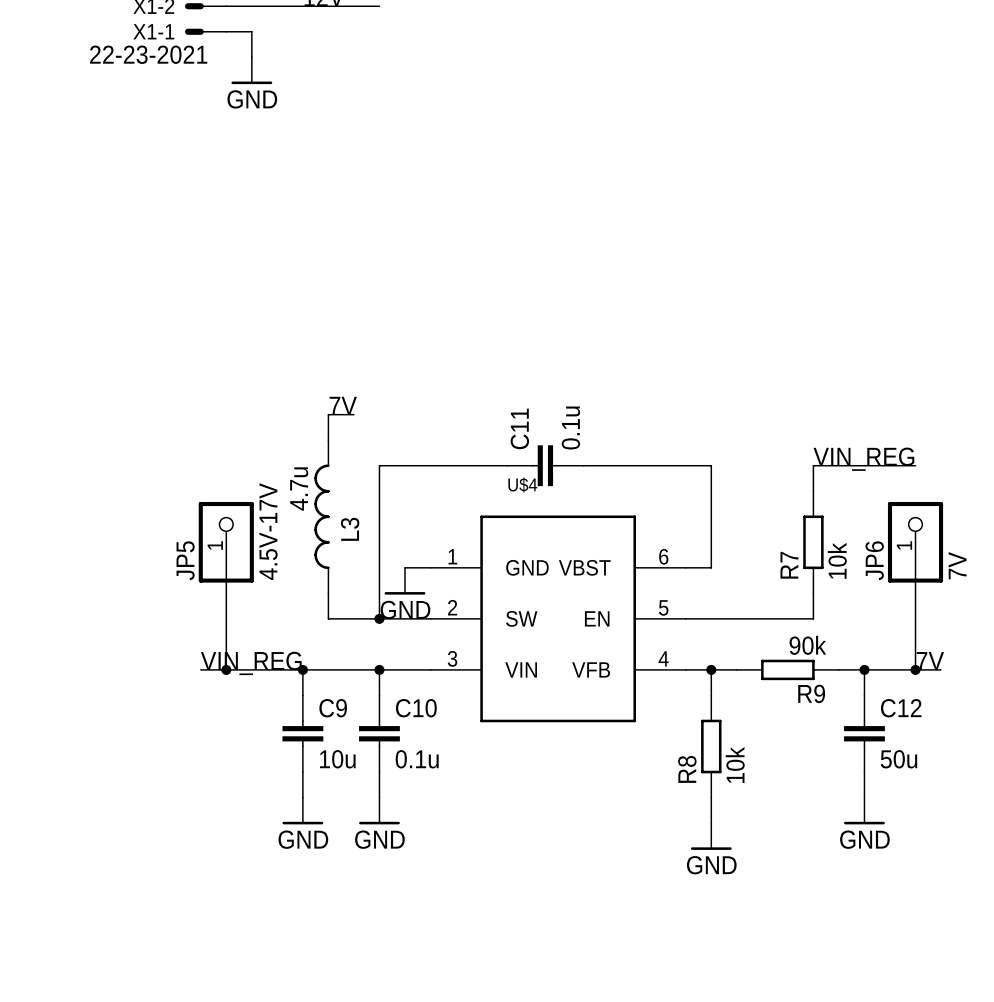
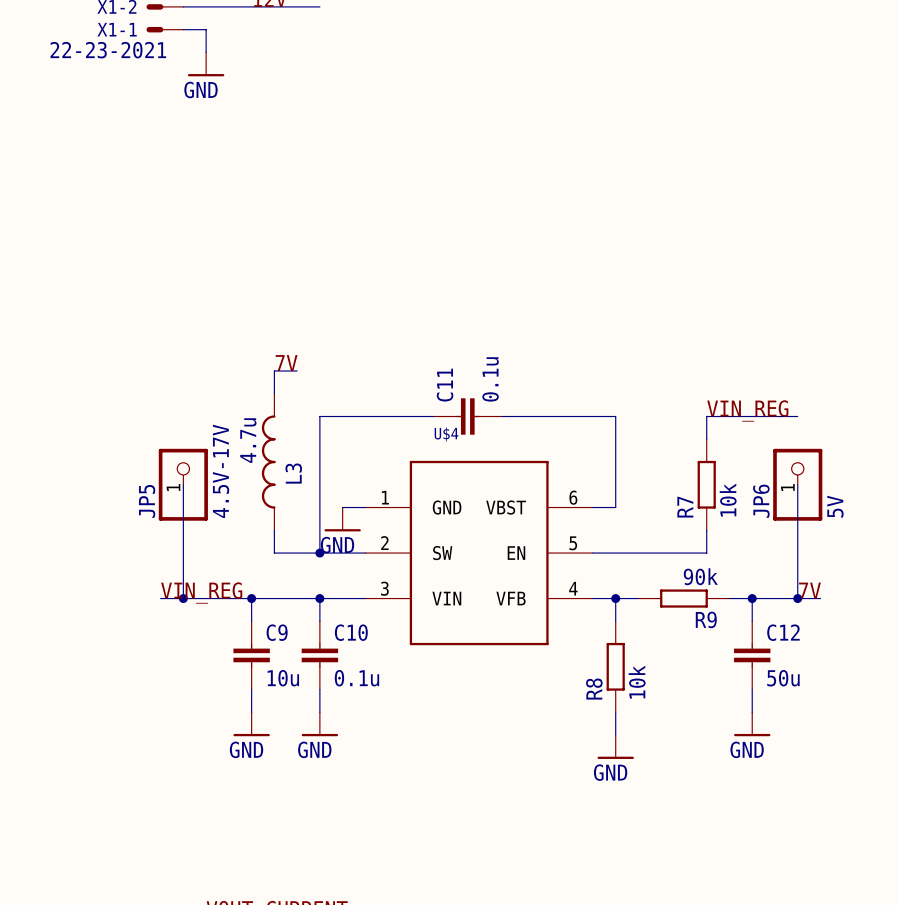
JP6 value: 7V (957, 565) -> 5V (835, 506)

